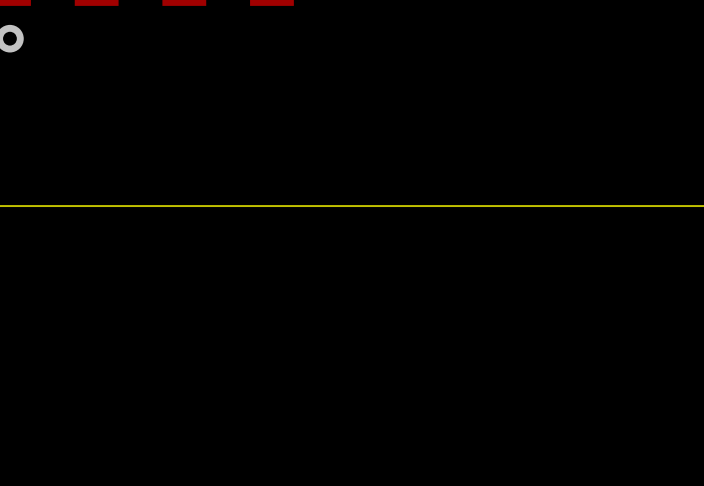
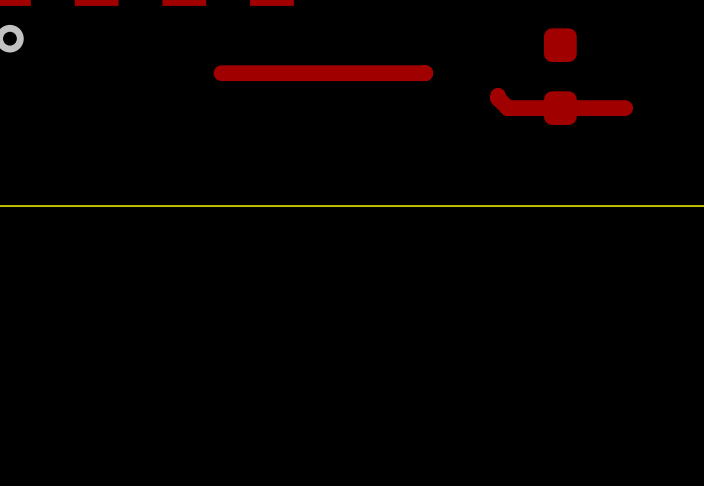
top track: none -> (425, 73) (221, 73)
part: none -> (560, 76)
top track: none -> (498, 95) (498, 98) (507, 108) (625, 108)

